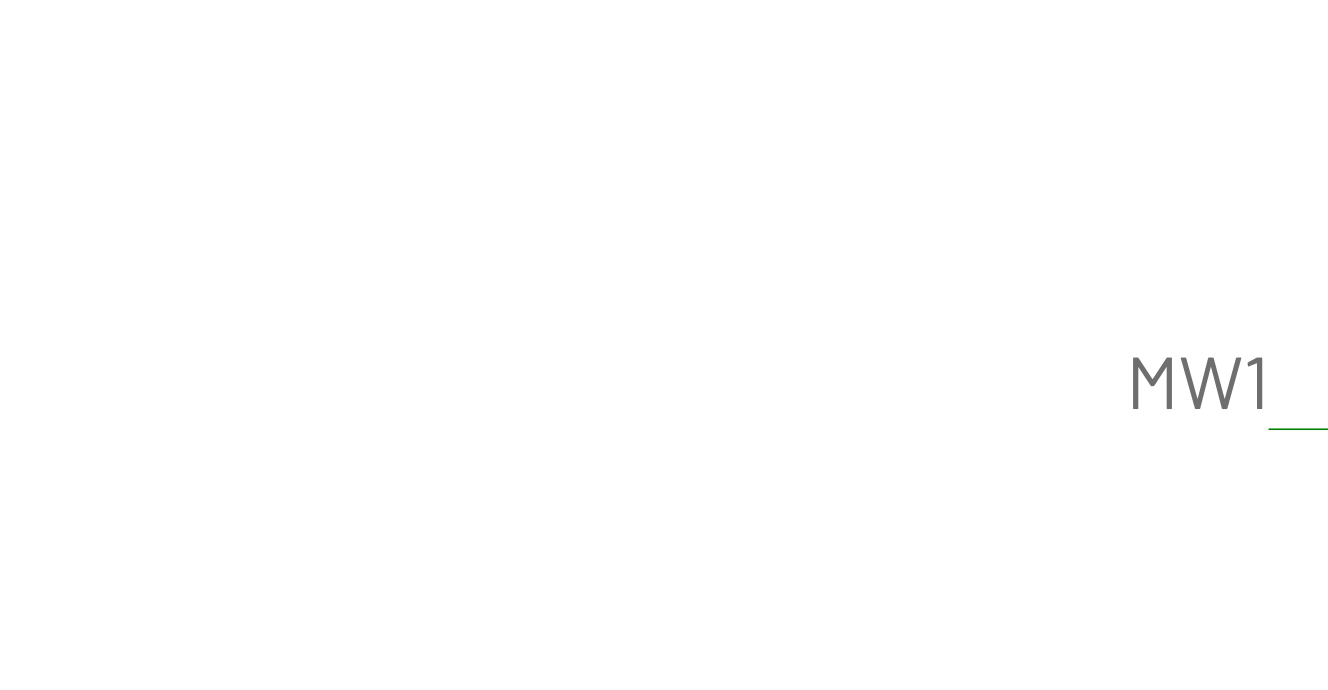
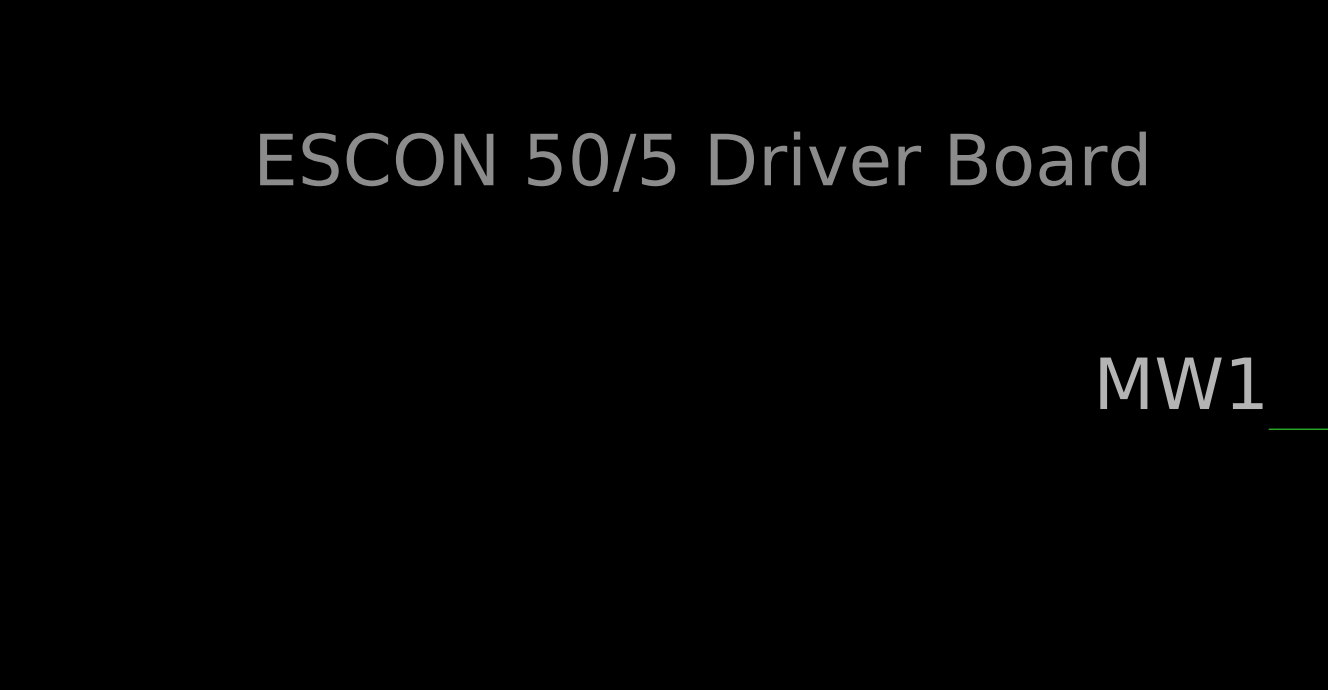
text: none -> ESCON 50/5 Driver Board (703, 161)

